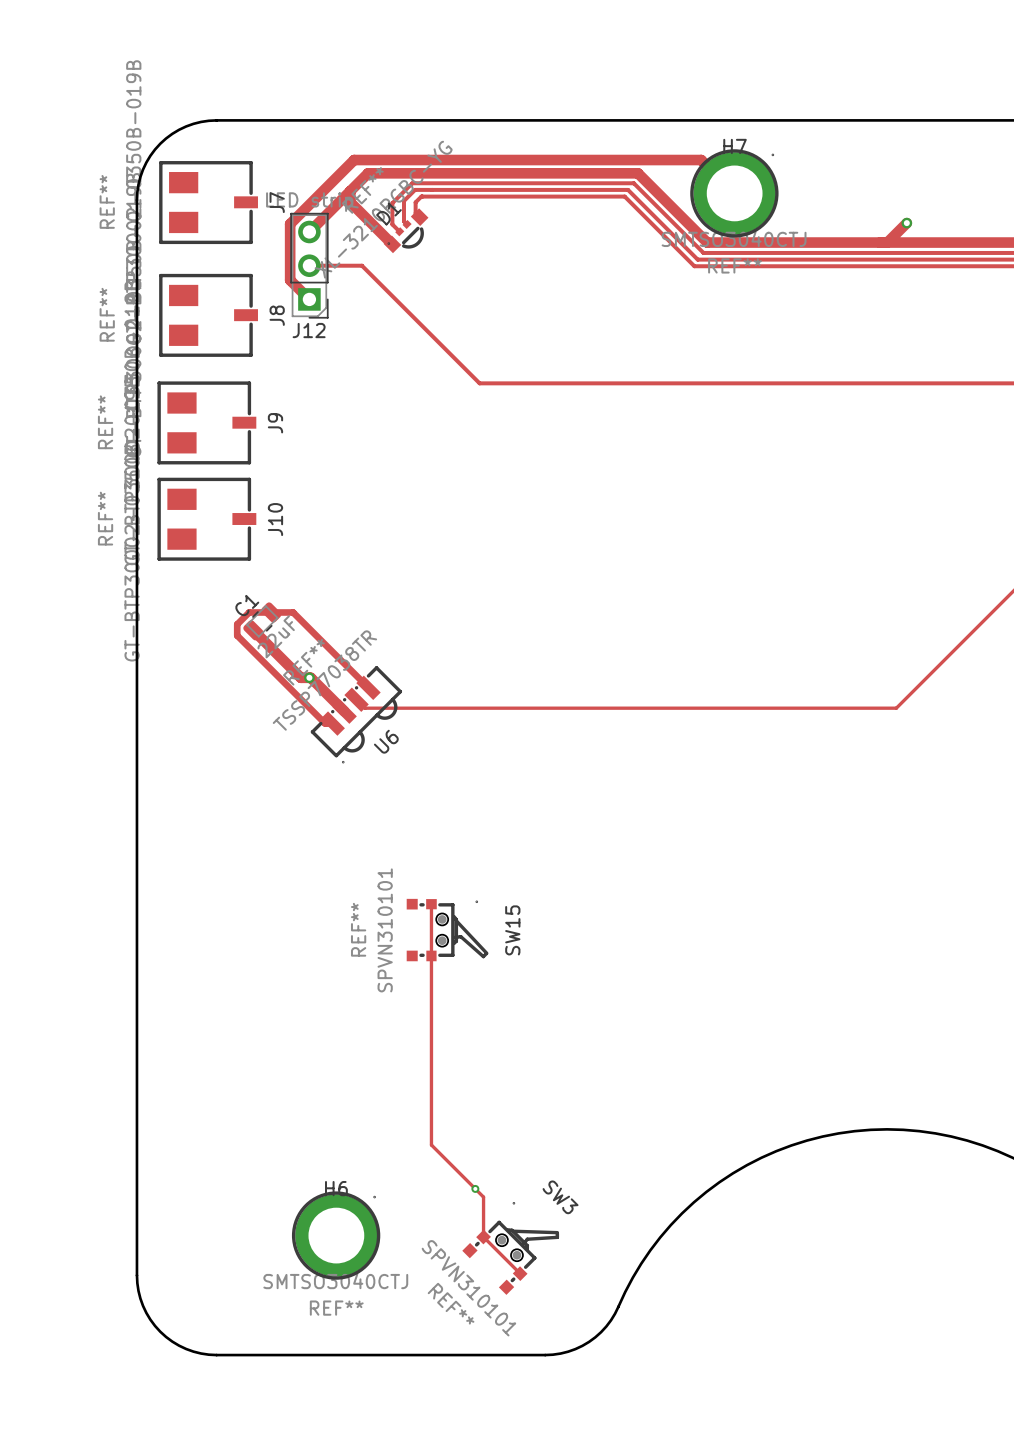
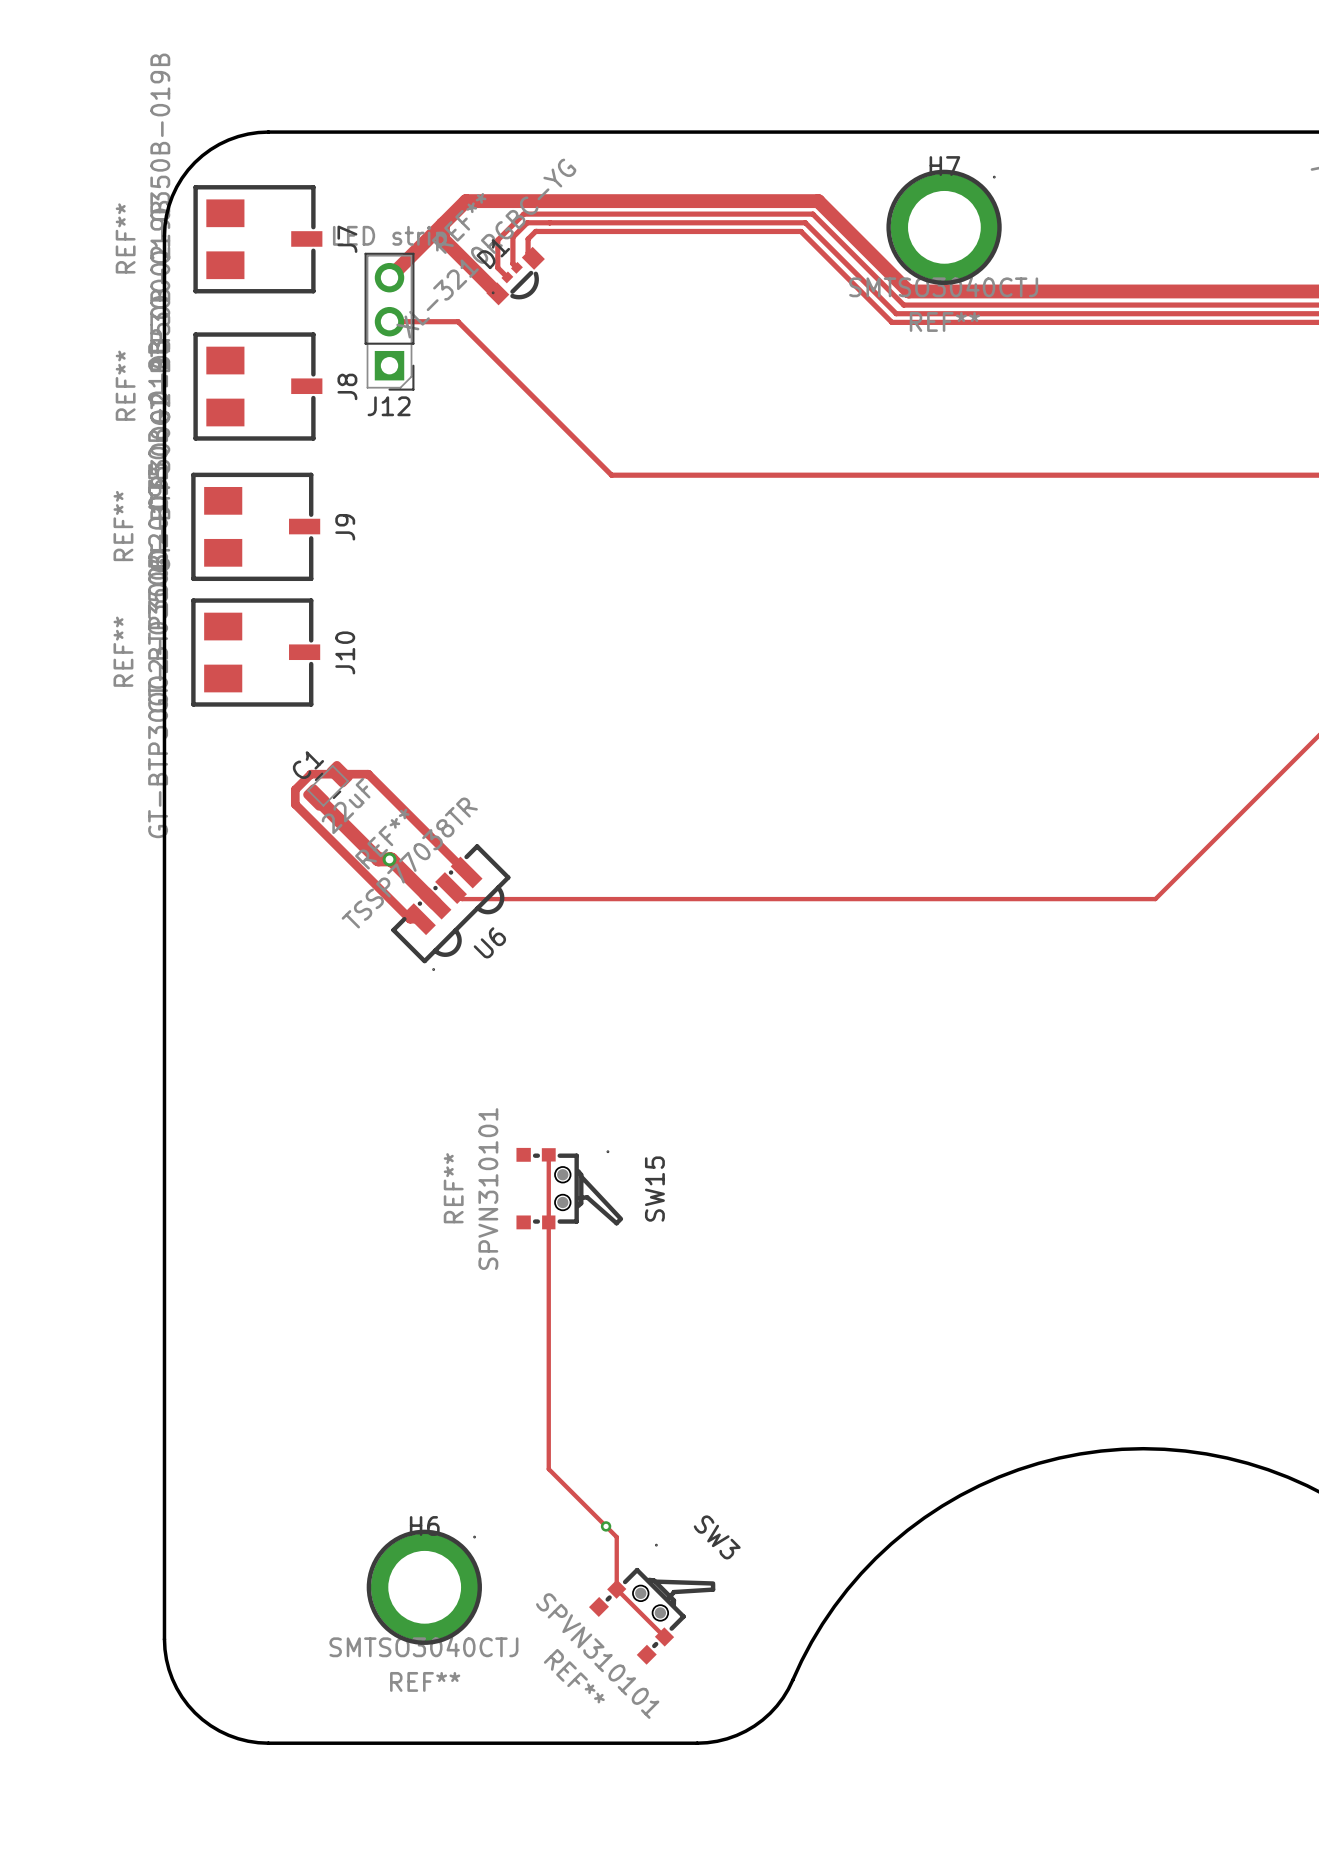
track: (734, 193) (701, 160) (354, 160) (290, 224) (290, 280) (309, 299) -> none
track: (906, 223) (887, 242) -> none
via: (906, 223) -> none

